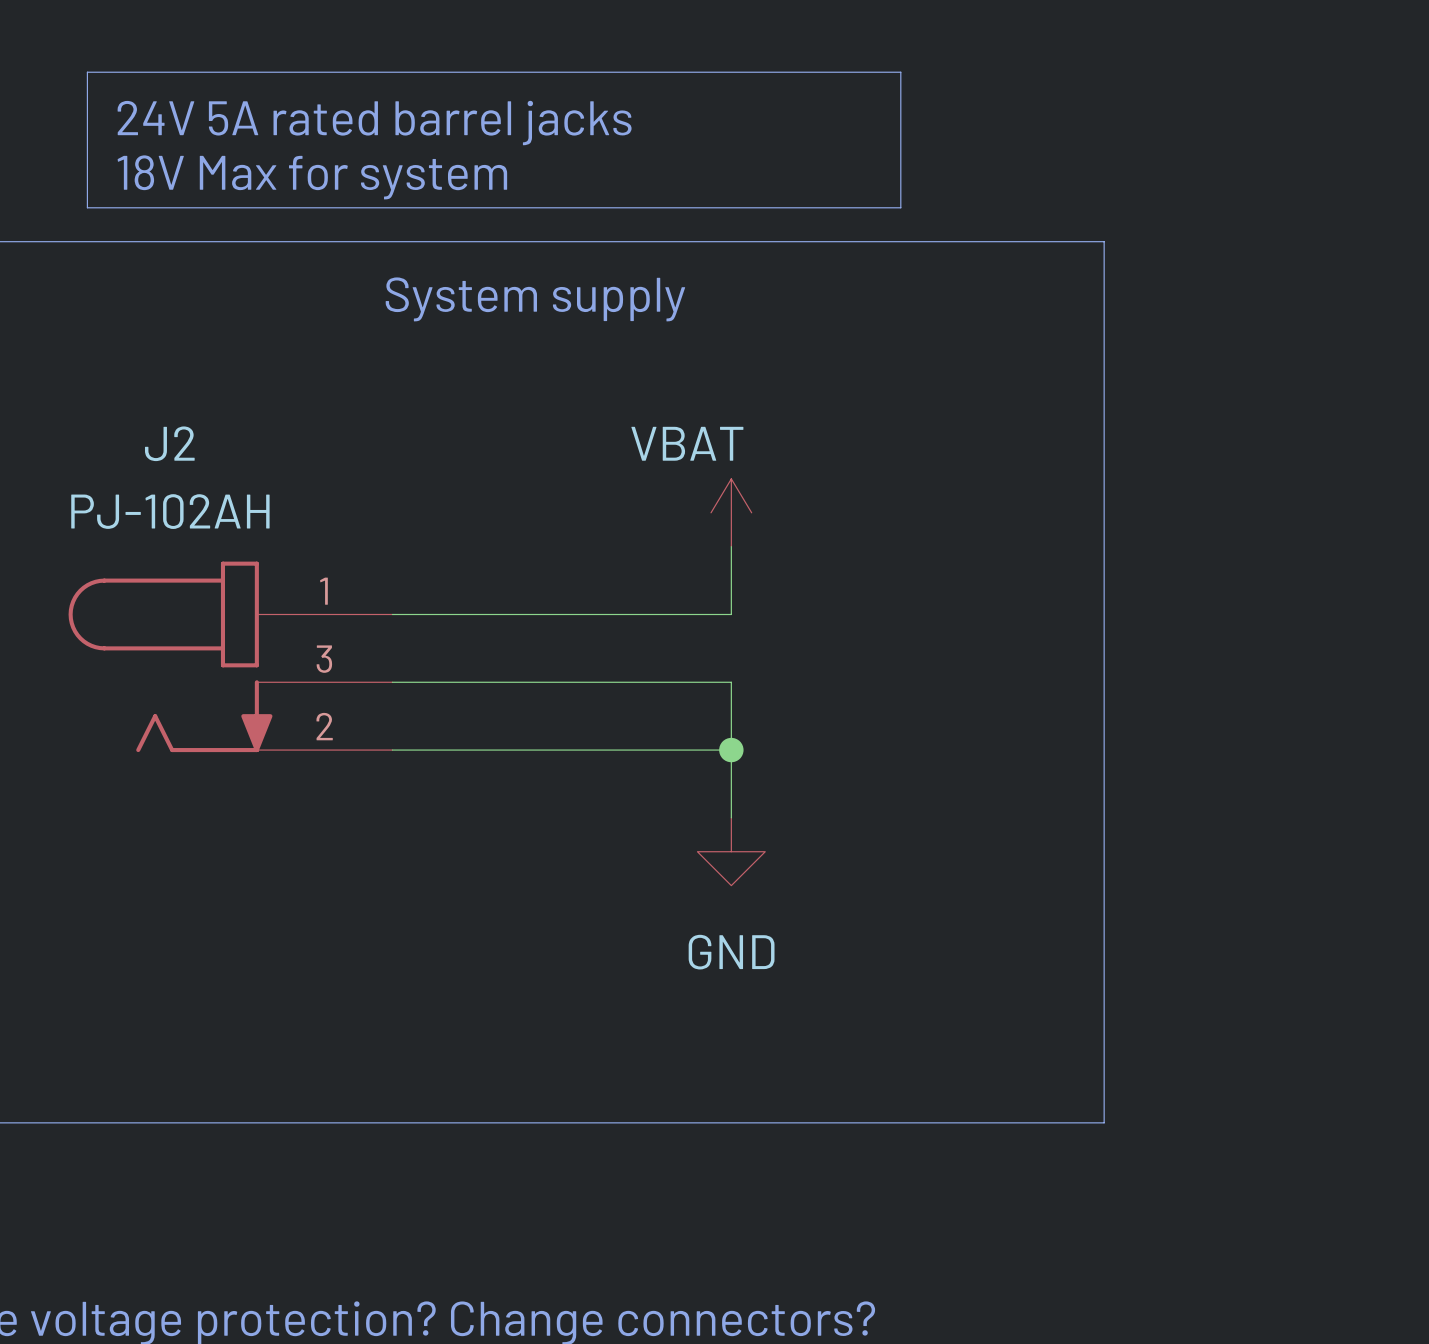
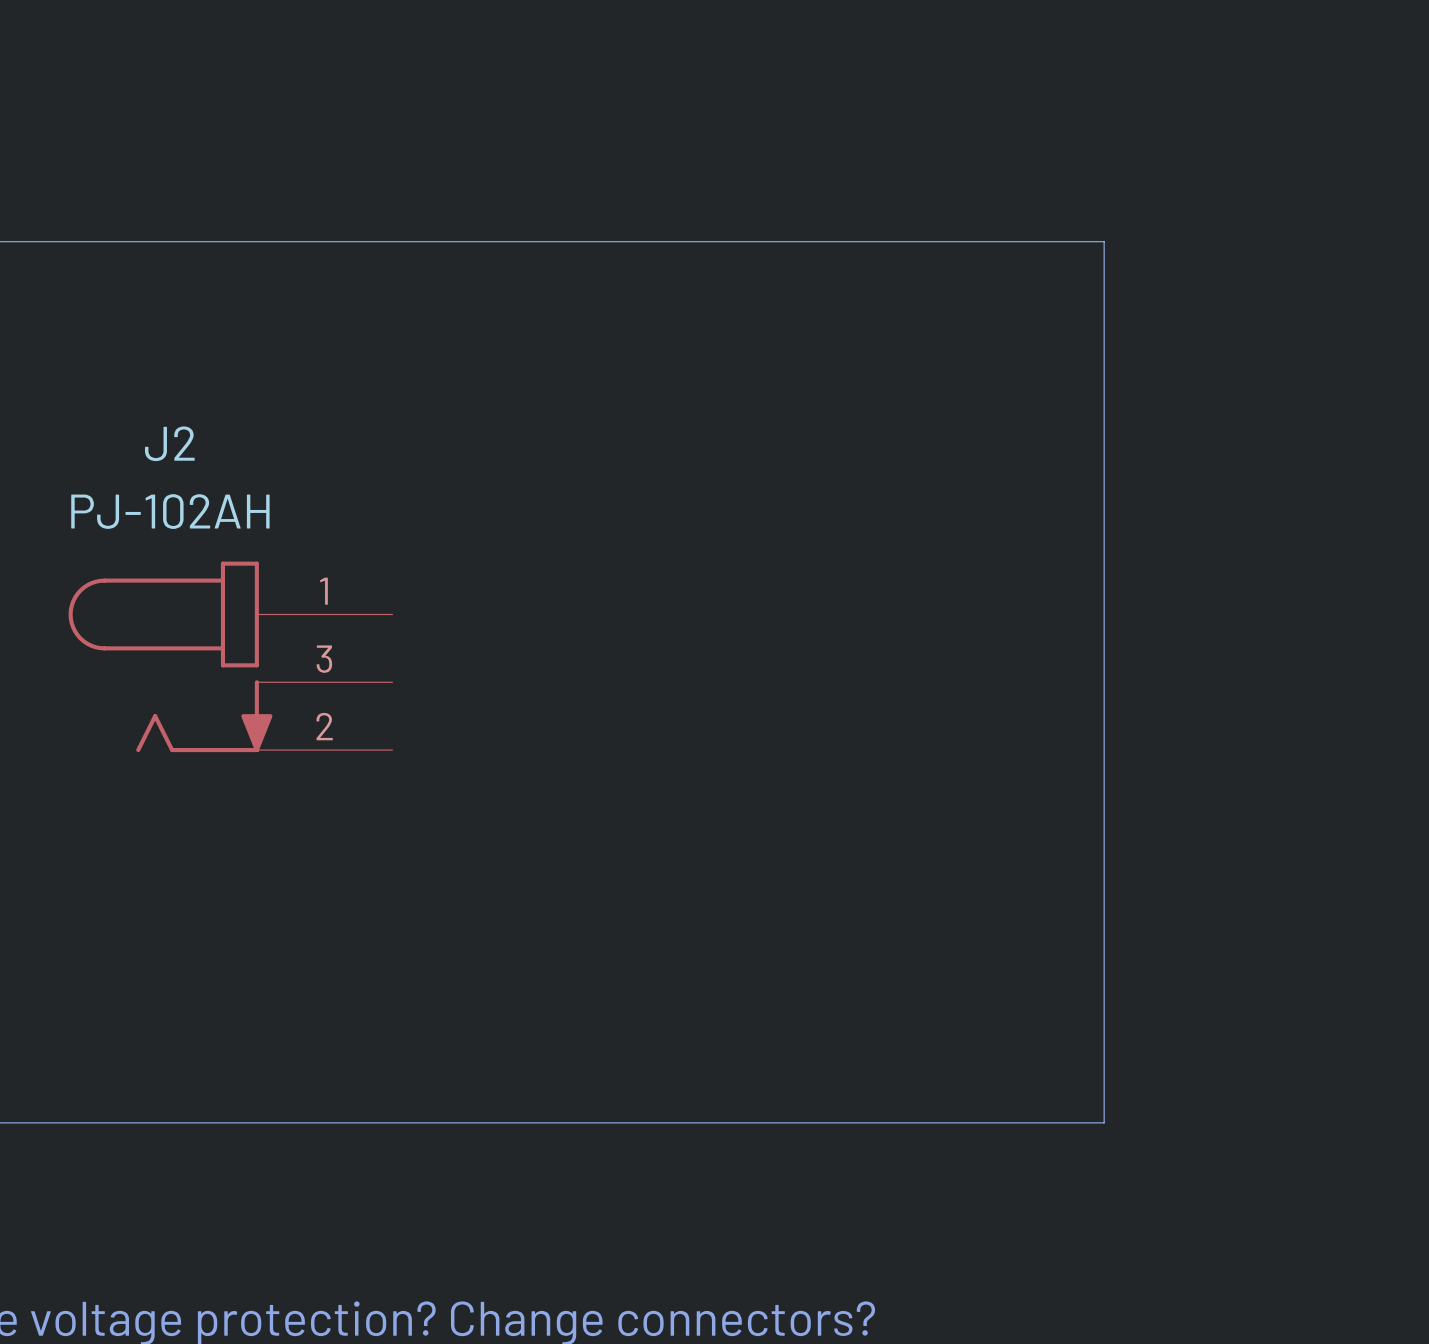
line: (87, 72) (900, 72) (900, 207) (87, 207) (87, 72) -> none
text: 24V 5A rated barrel jacks (374, 123) -> none
text: 18V Max for system (312, 177) -> none
text: System supply (535, 299) -> none
power symbol: VBAT (731, 512) -> none
wire: (731, 546) (731, 614) (392, 614) -> none
wire: (392, 682) (731, 682) (731, 817) -> none
wire: (392, 750) (731, 750) -> none
junction: (731, 750) -> none
power symbol: GND (731, 851) -> none

